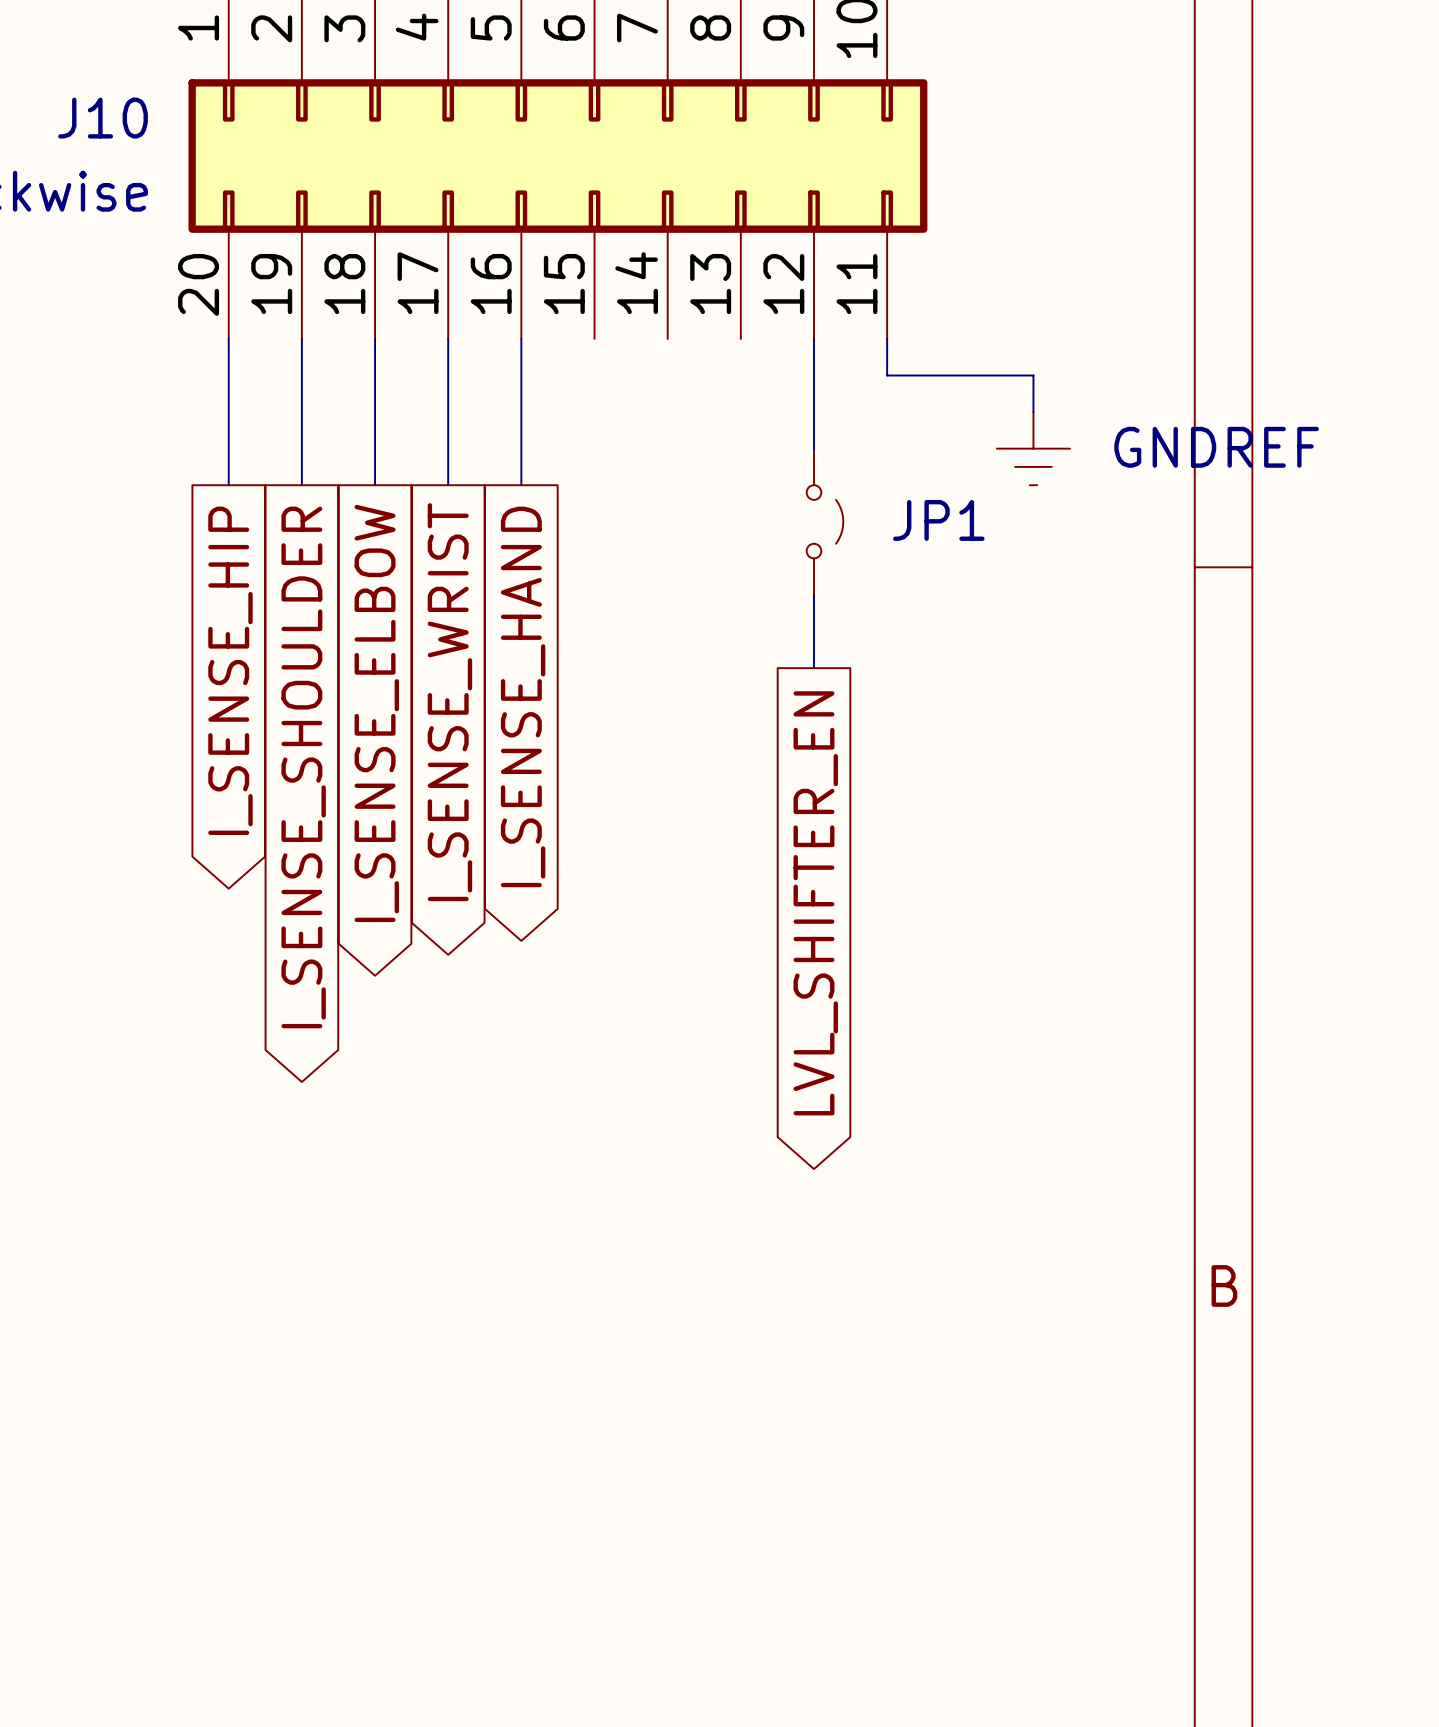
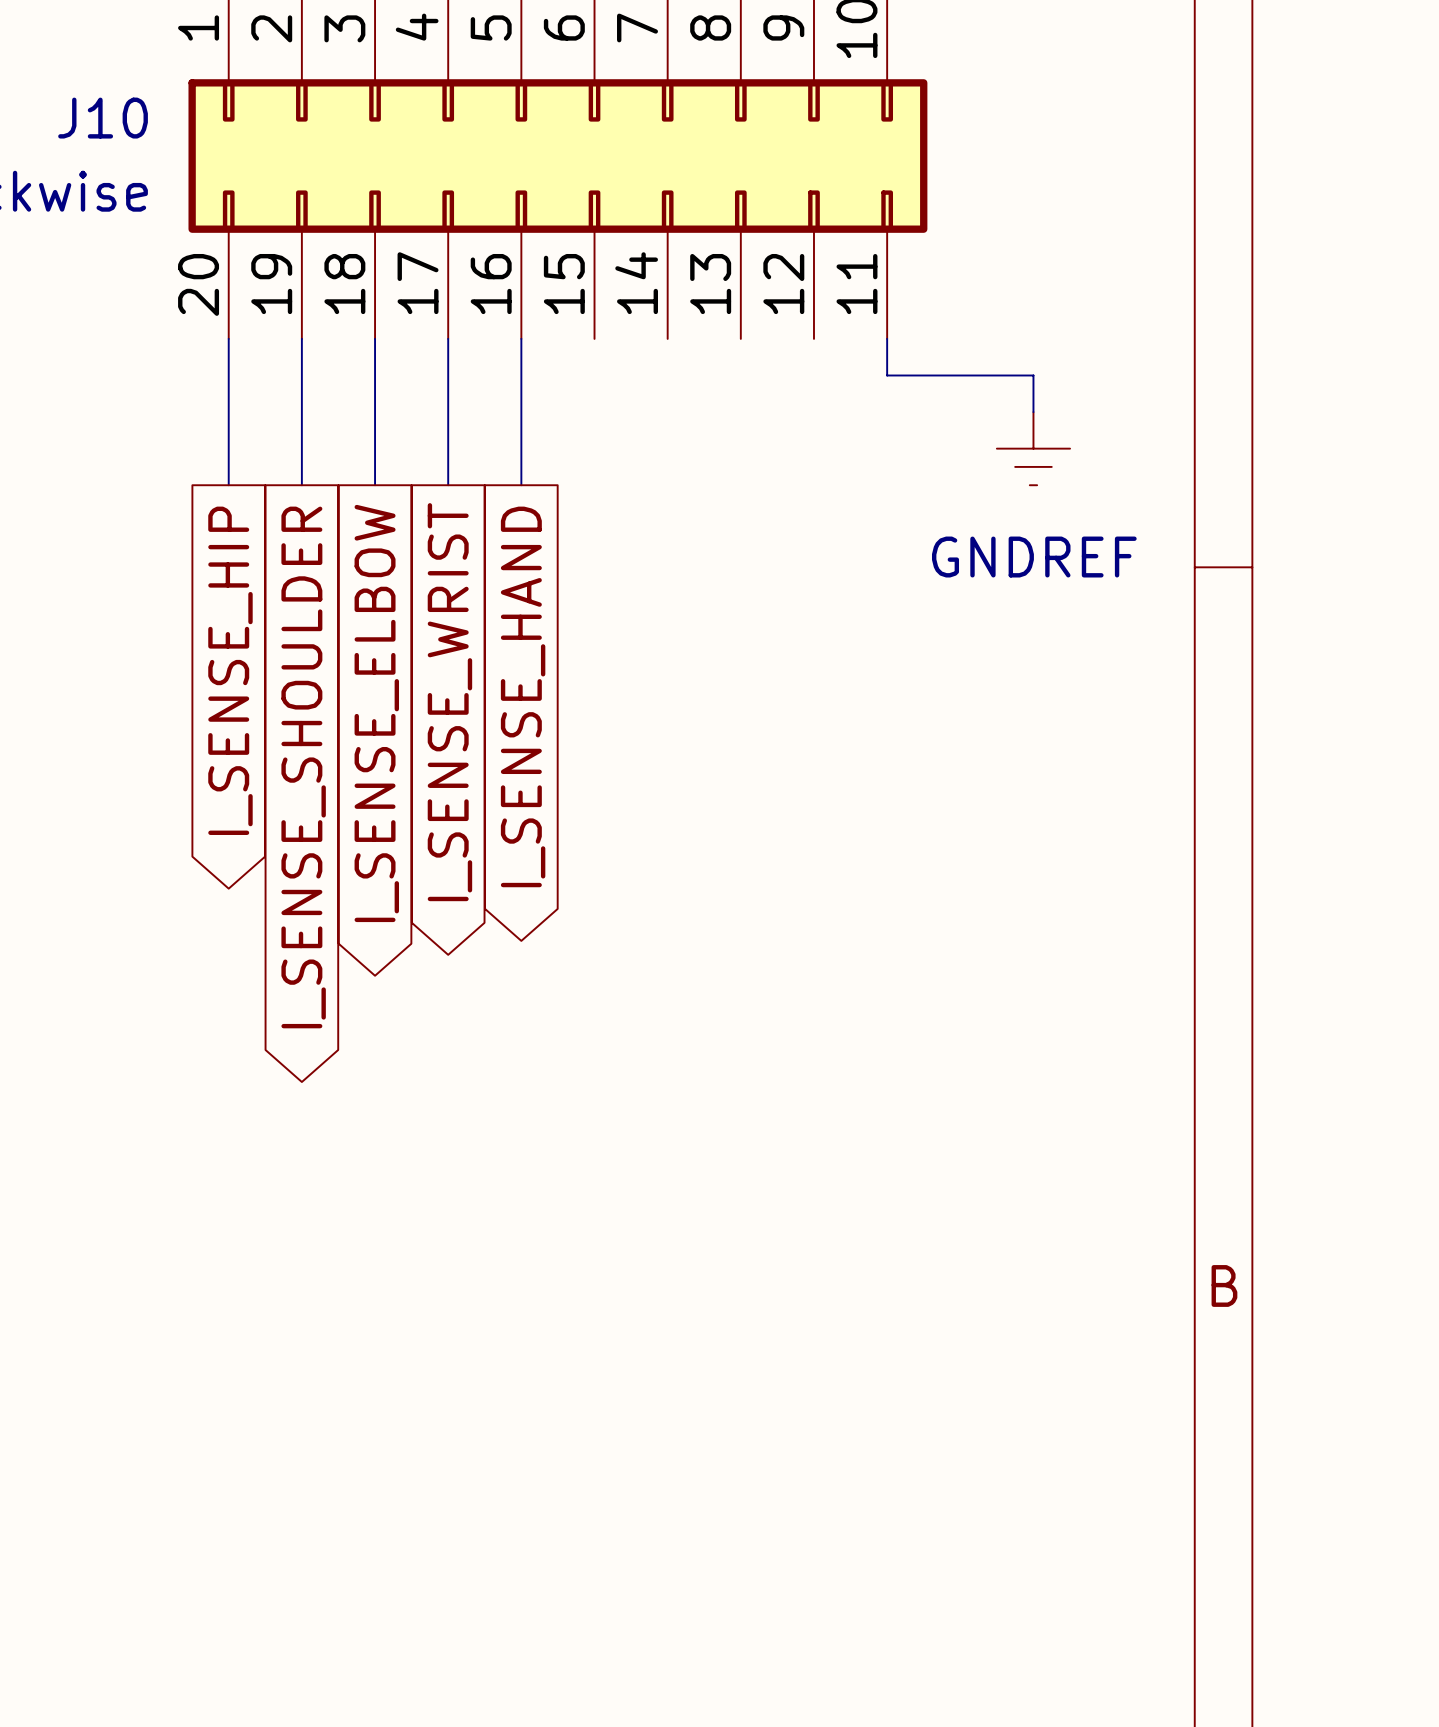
wire: (813, 338) (813, 448) -> none
power symbol text position: GNDREF (1216, 447) -> GNDREF (1034, 557)
JP1: (825, 521) -> none
wire: (813, 594) (813, 668) -> none
global label: LVL_SHIFTER_EN (815, 903) -> none

